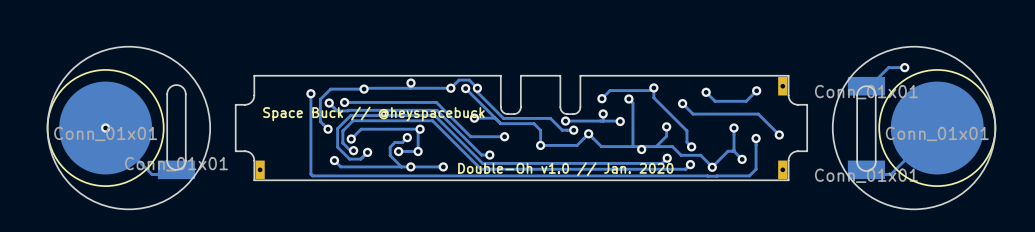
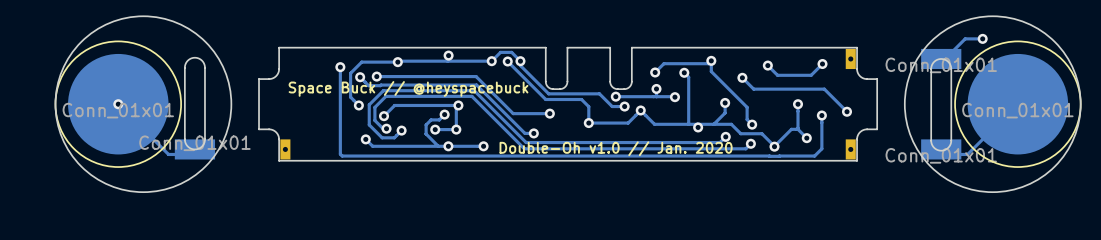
via: (474, 118) -> none
track: (495, 118) (474, 118) -> none

